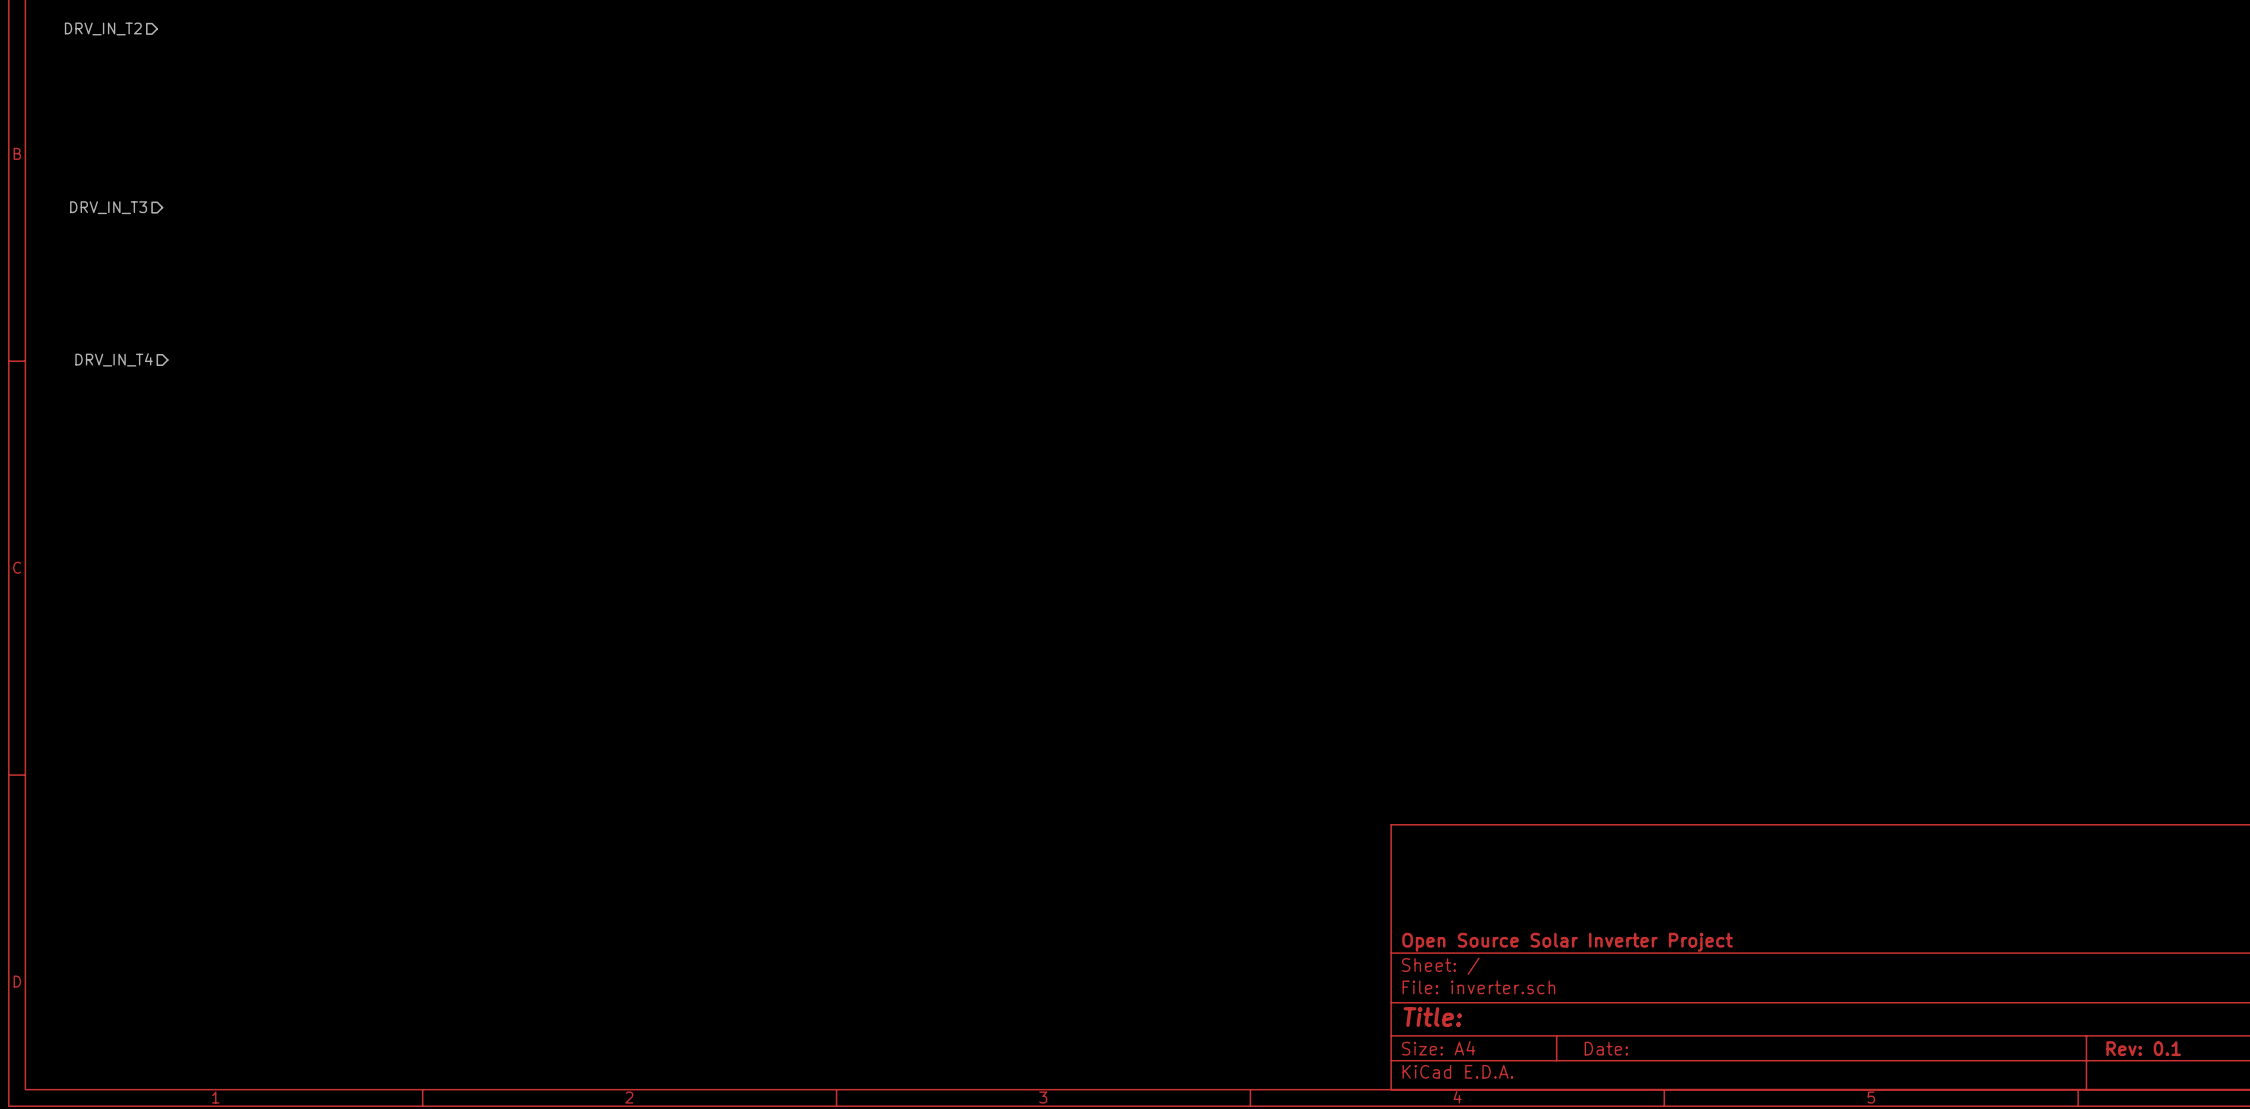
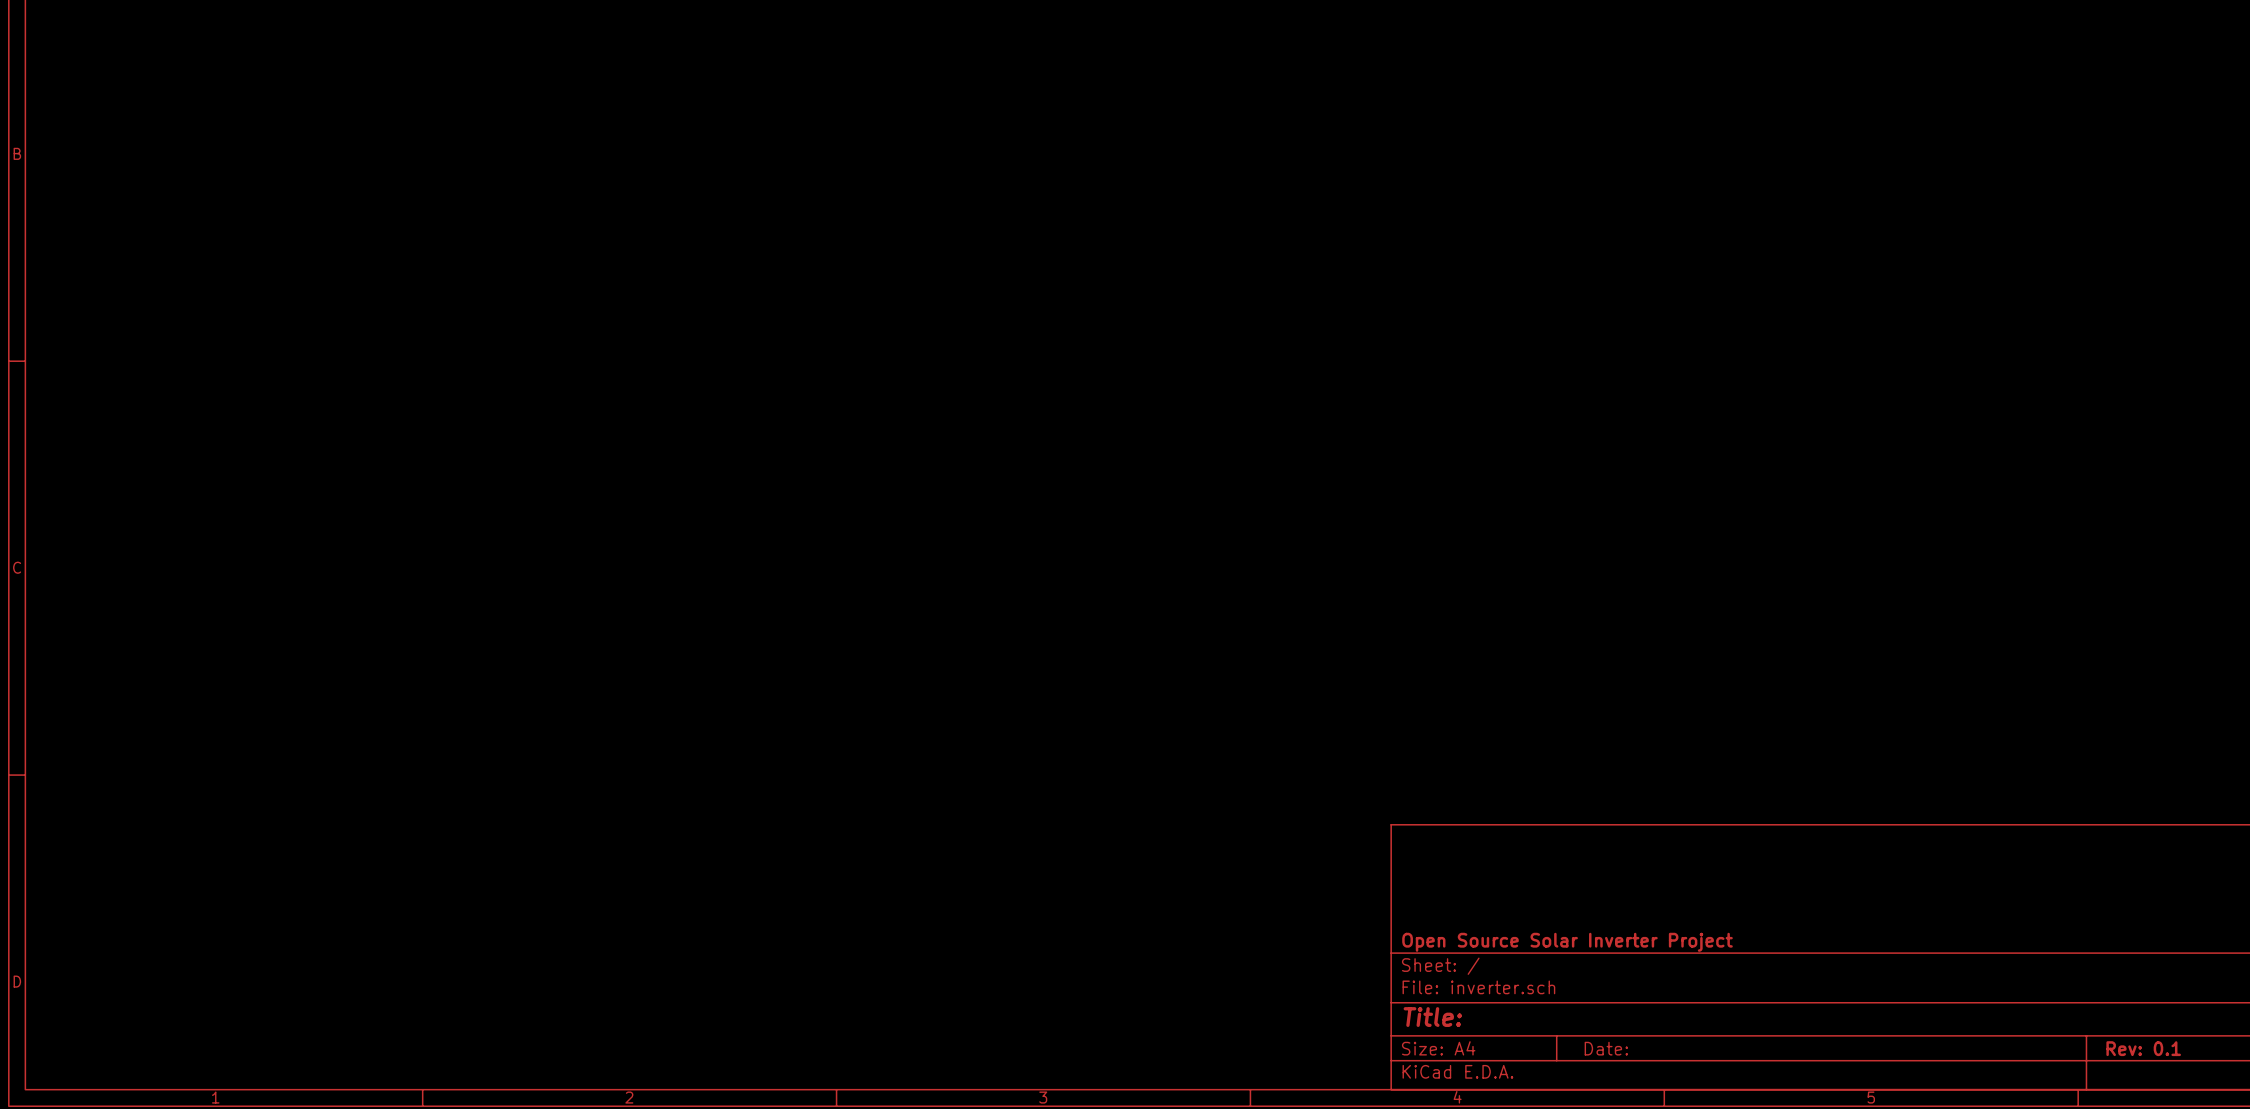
hierarchical label: DRV_IN_T2 (103, 28) -> none
hierarchical label: DRV_IN_T3 (108, 207) -> none
hierarchical label: DRV_IN_T4 (114, 359) -> none

